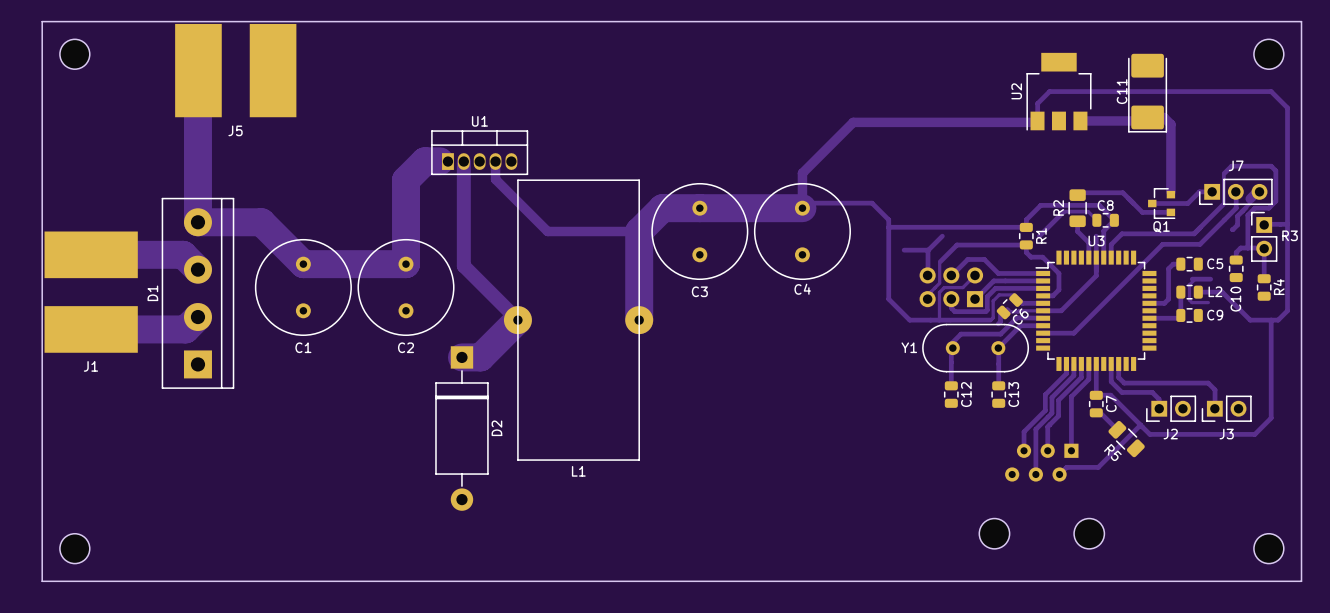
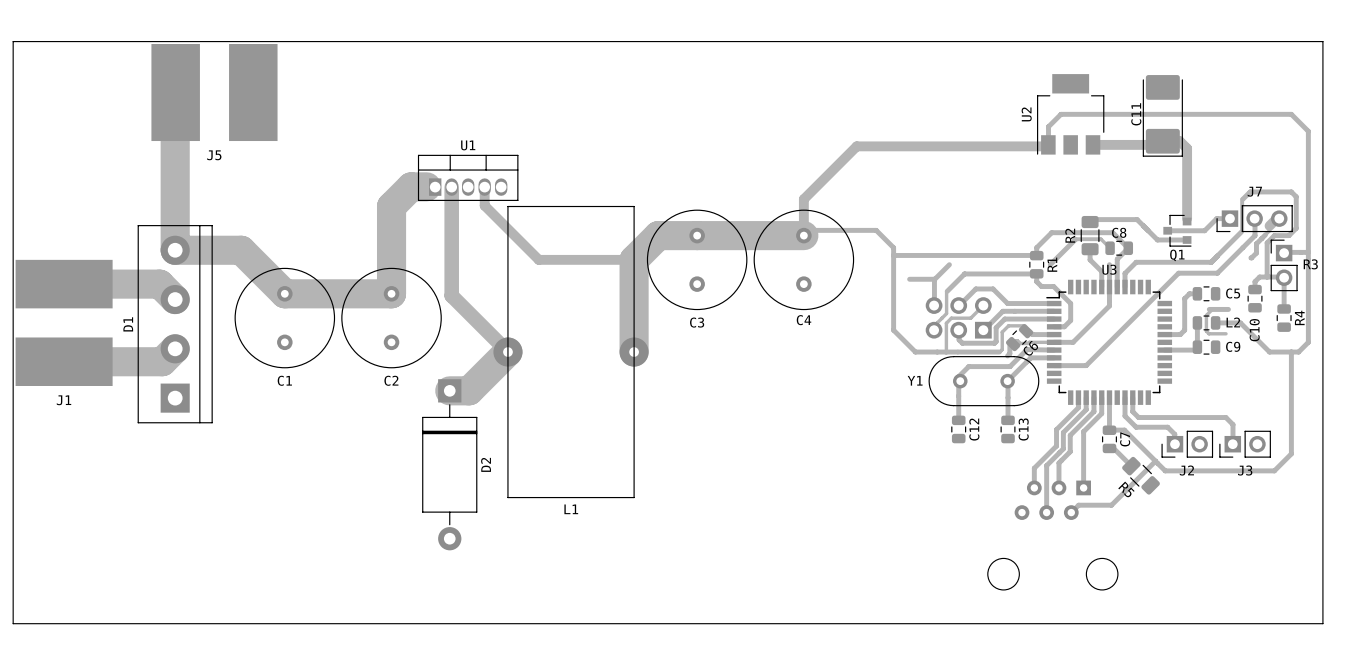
part: (74, 54) -> none
part: (1268, 54) -> none
part: (74, 548) -> none
part: (1268, 548) -> none

